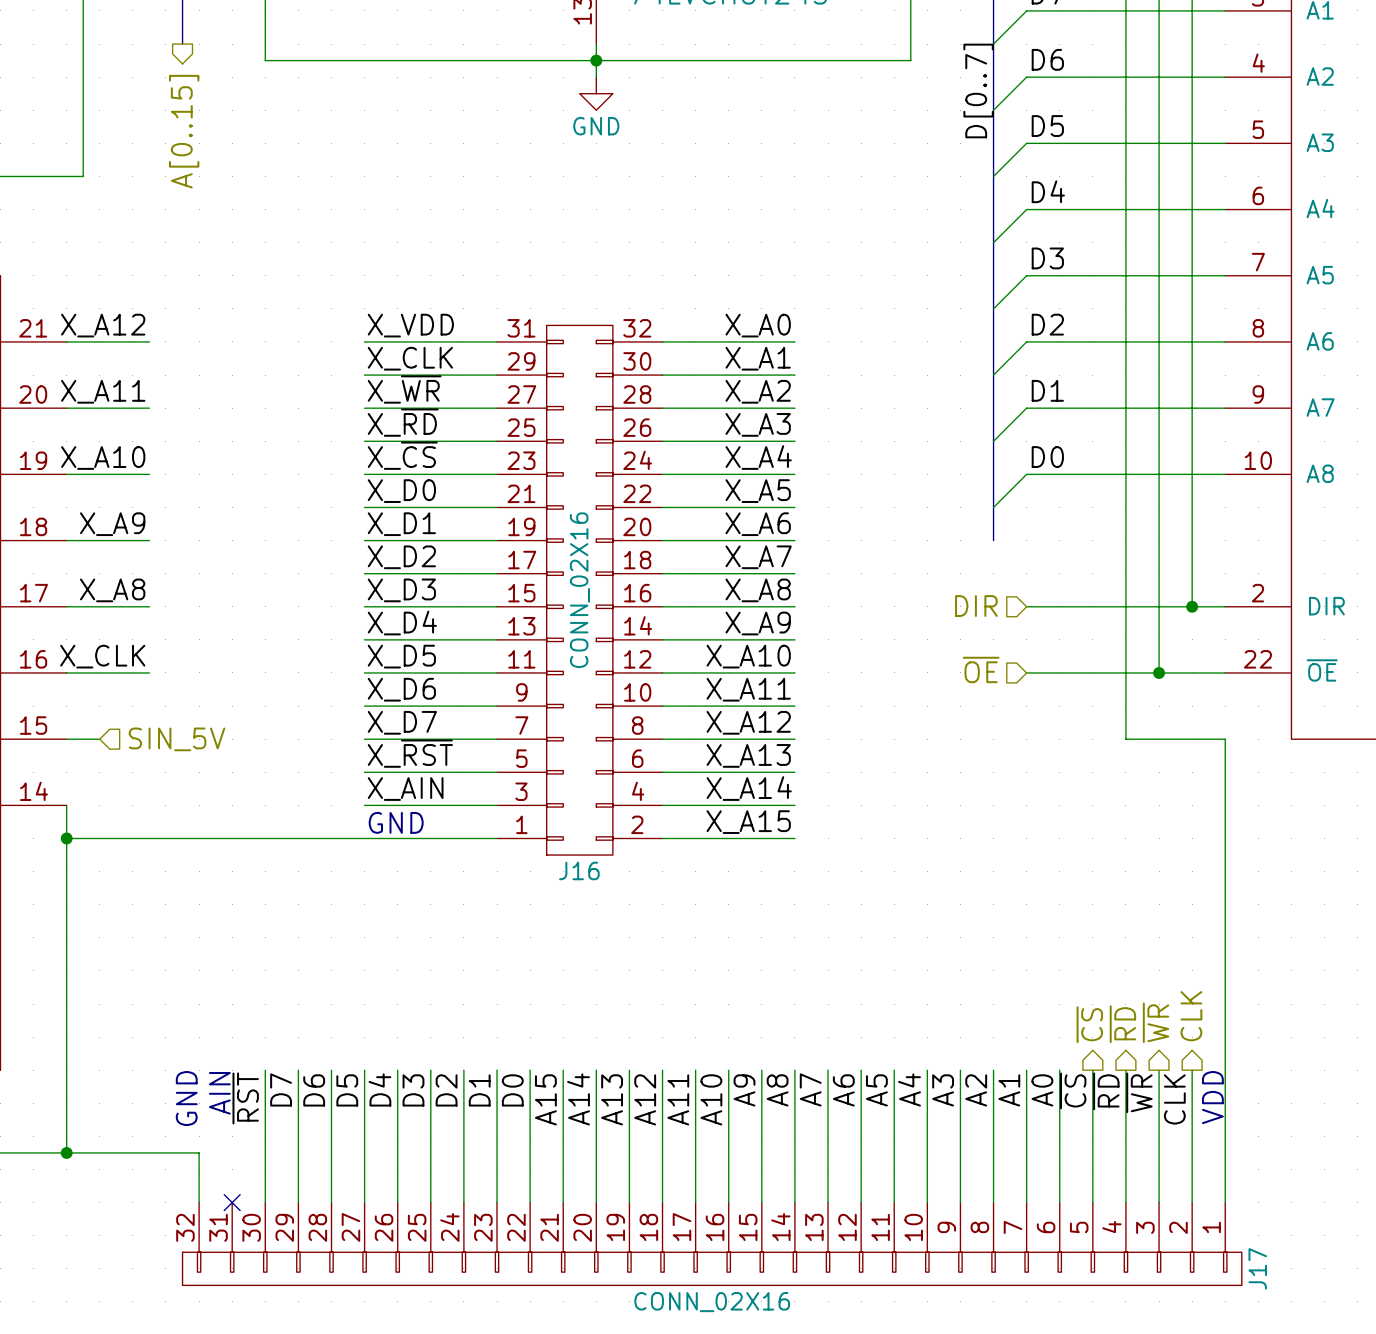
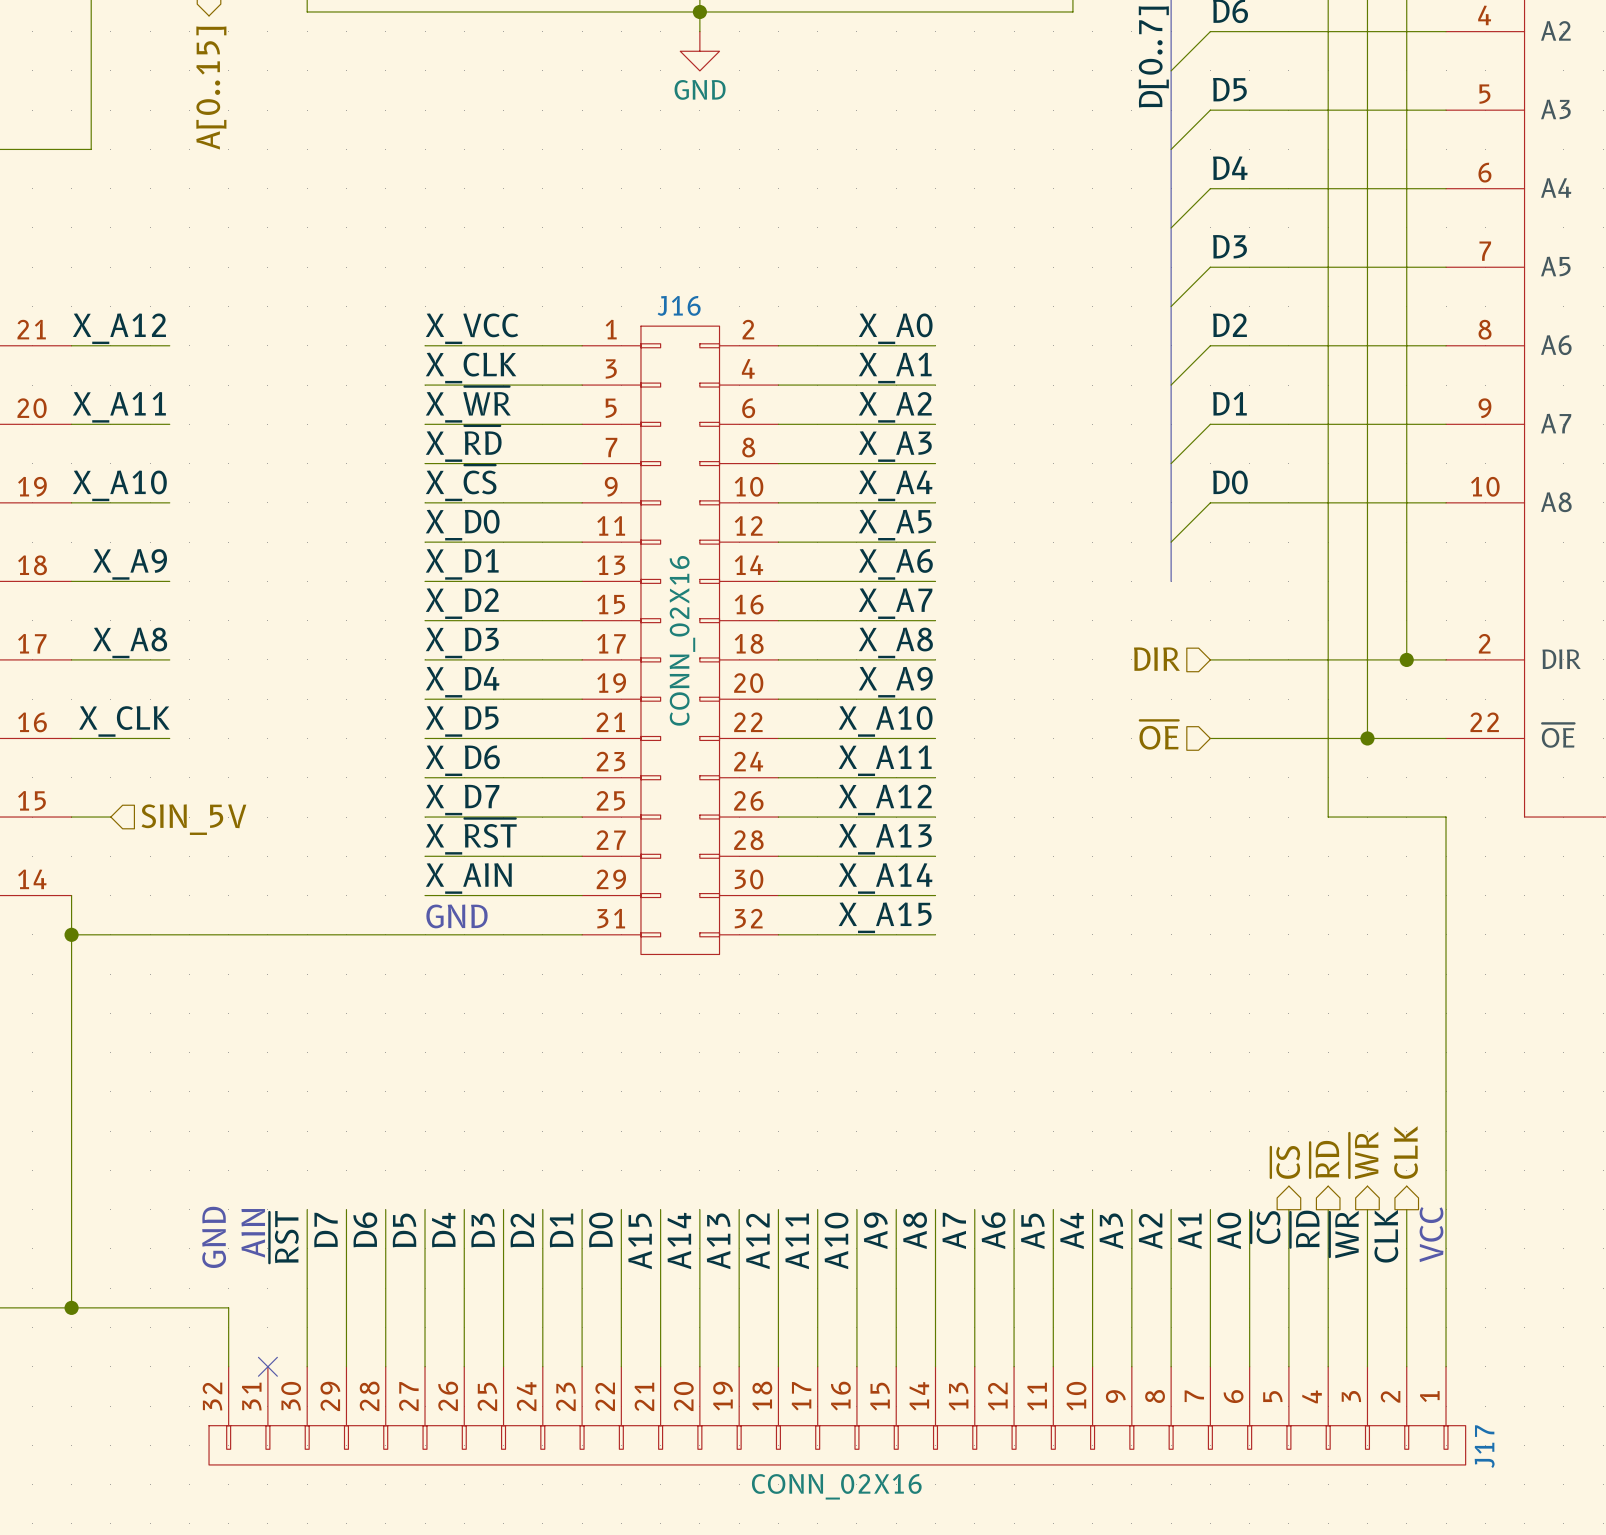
label: X_VDD (410, 325) -> X_VCC (472, 328)
J16 flip: as is (579, 590) -> up-down (680, 640)
text: VDD (1212, 1097) -> VCC (1431, 1234)

